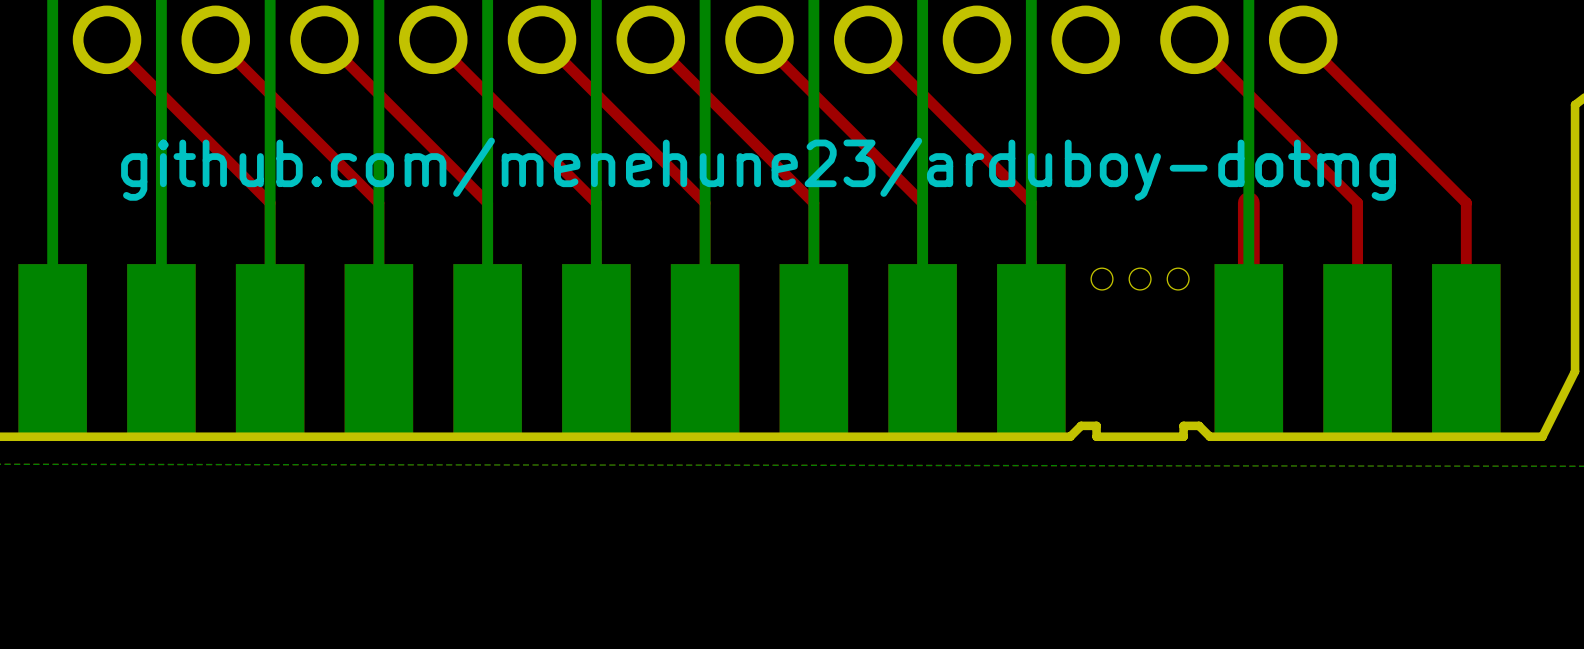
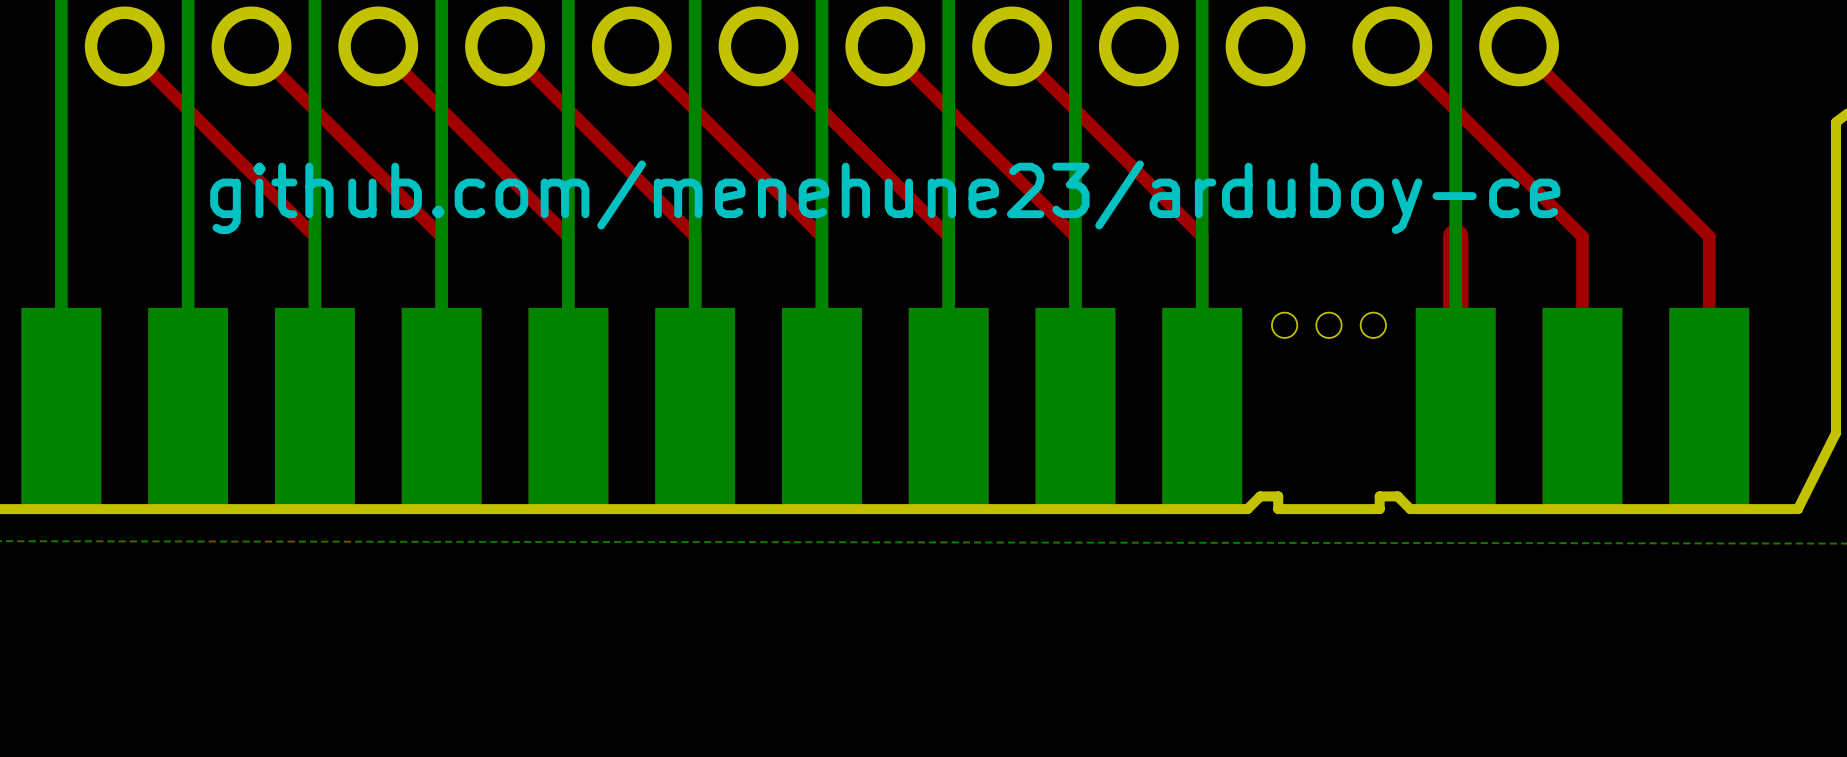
text: github.com/menehune23/arduboy-dotmg (758, 169) -> github.com/menehune23/arduboy-ce (885, 197)

